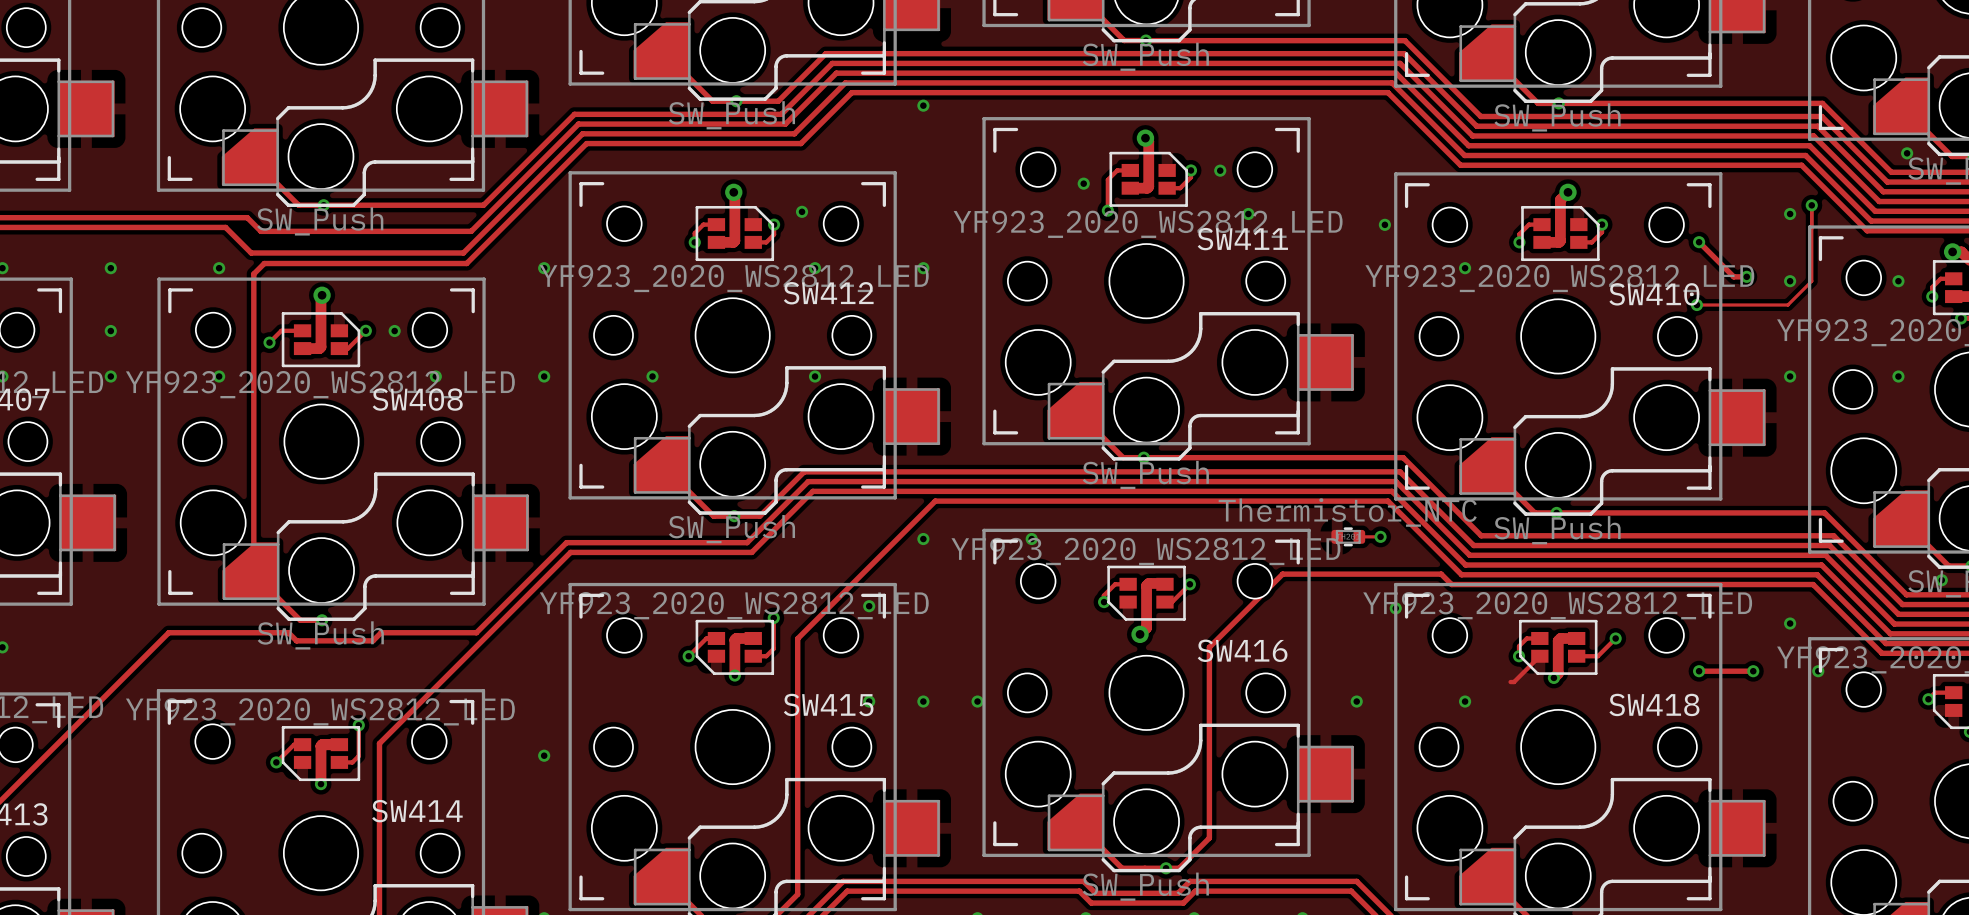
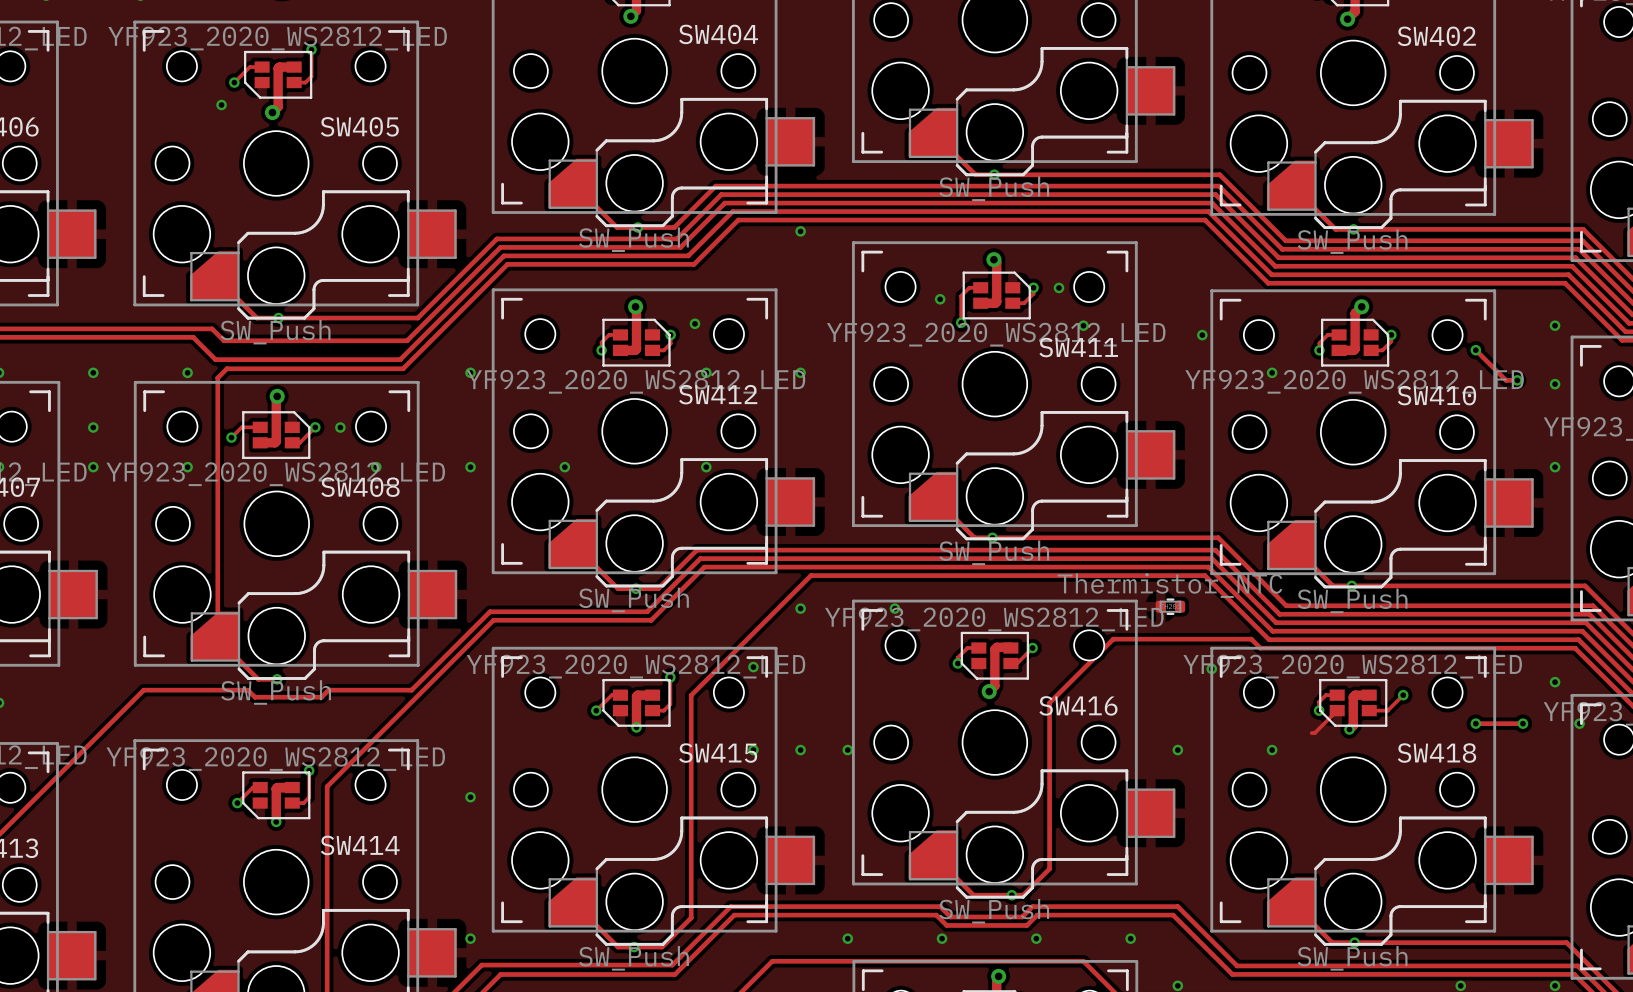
track: (1811, 205) (1811, 281) (1787, 305) (1696, 305) -> none
via: (1811, 205) -> none
via: (1696, 305) -> none
track: (1359, 536) (1380, 536) -> none
via: (1380, 536) -> none

